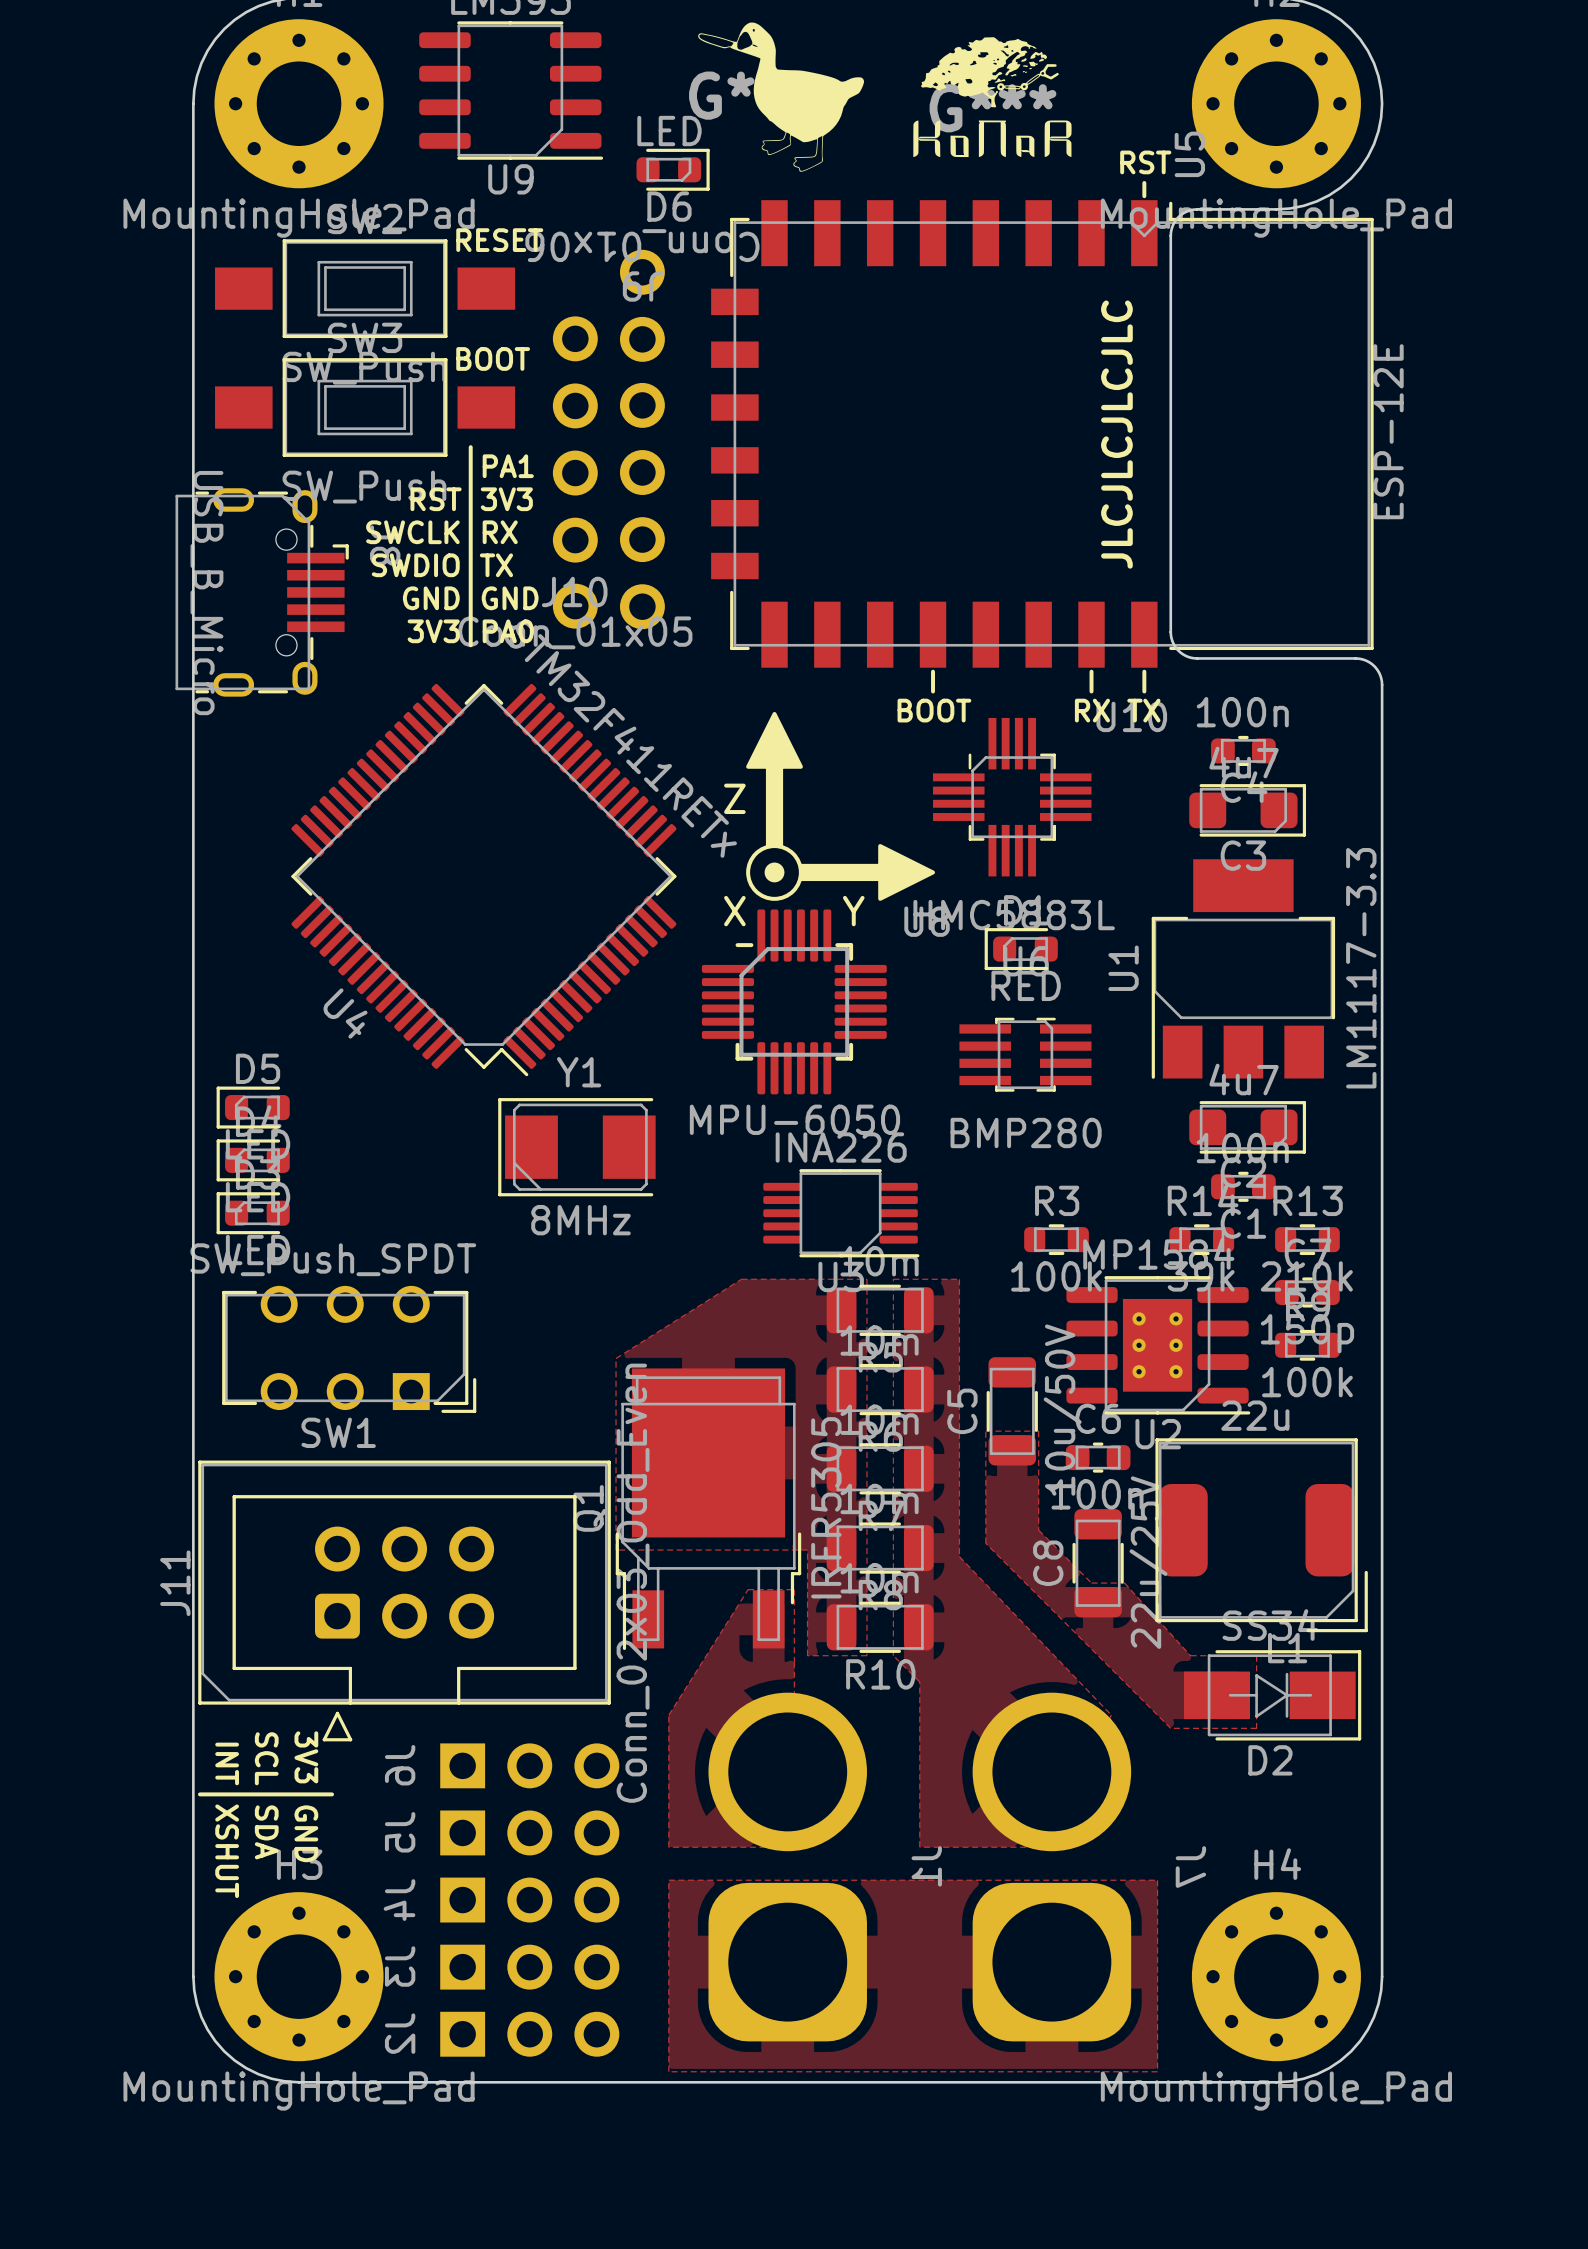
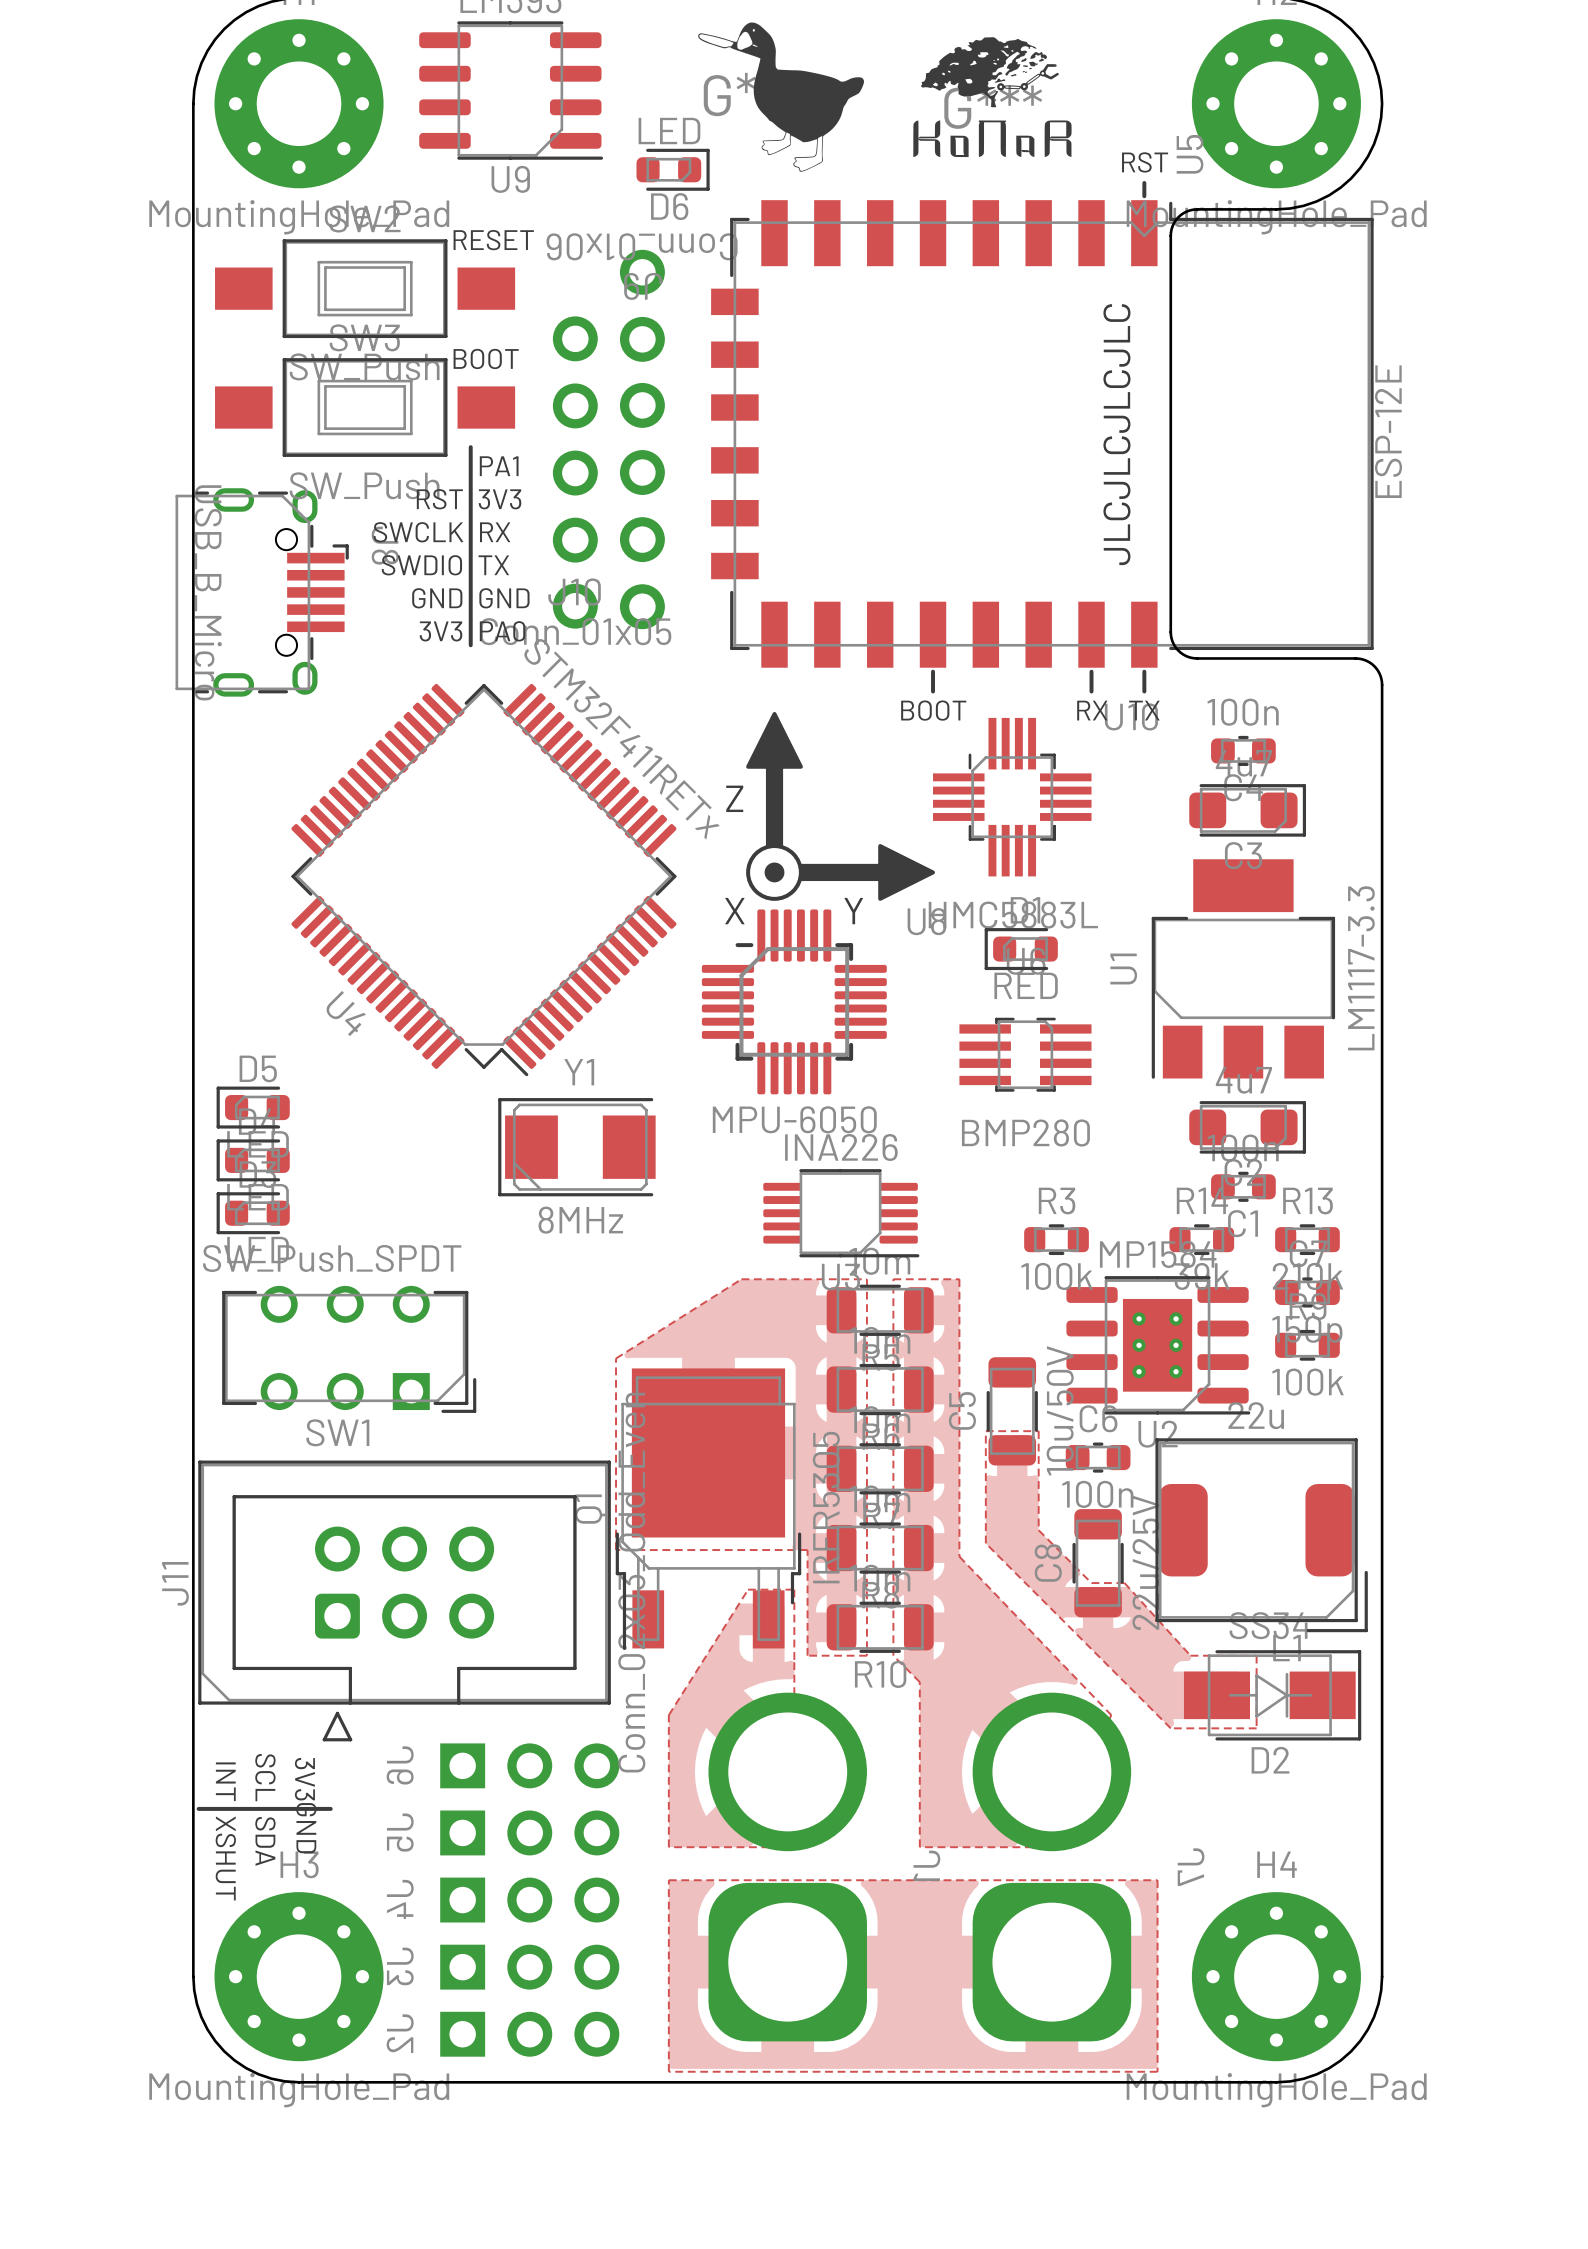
text position: 3V3 (306, 1757) -> 3V3 (304, 1779)
text position: SCL (266, 1758) -> SCL (265, 1777)
text position: INT (227, 1763) -> INT (225, 1781)
line: (199, 1794) (332, 1794) -> (198, 1808) (330, 1808)
text position: SDA (266, 1832) -> SDA (265, 1841)
text position: XSHUT (227, 1851) -> XSHUT (225, 1858)

